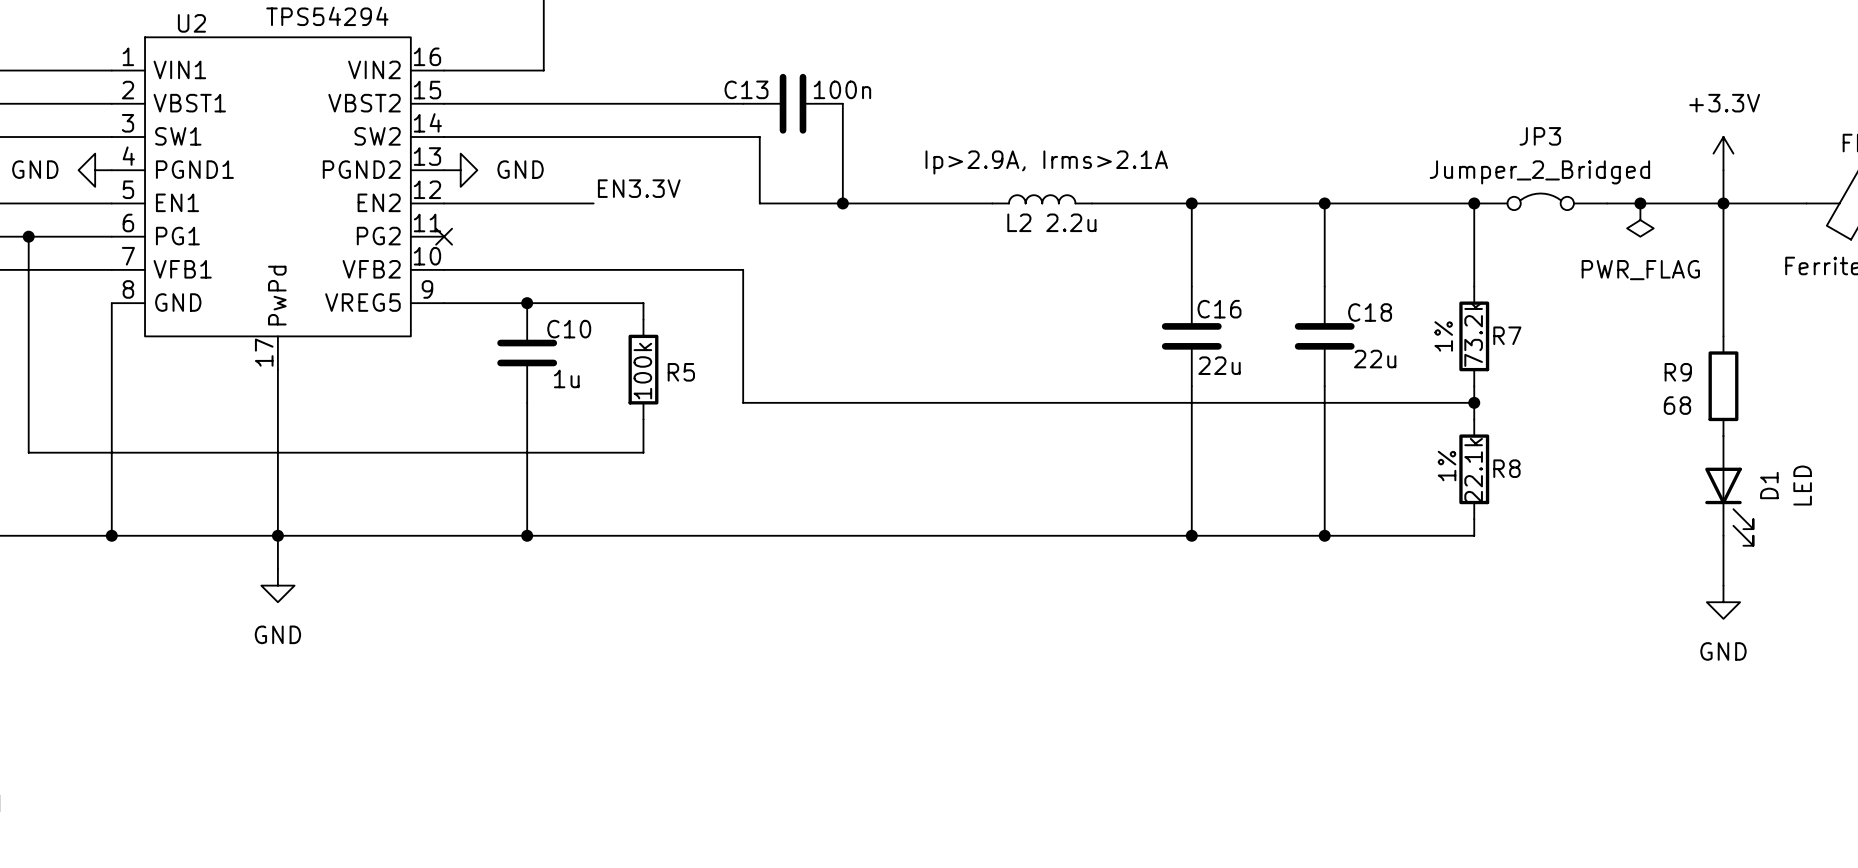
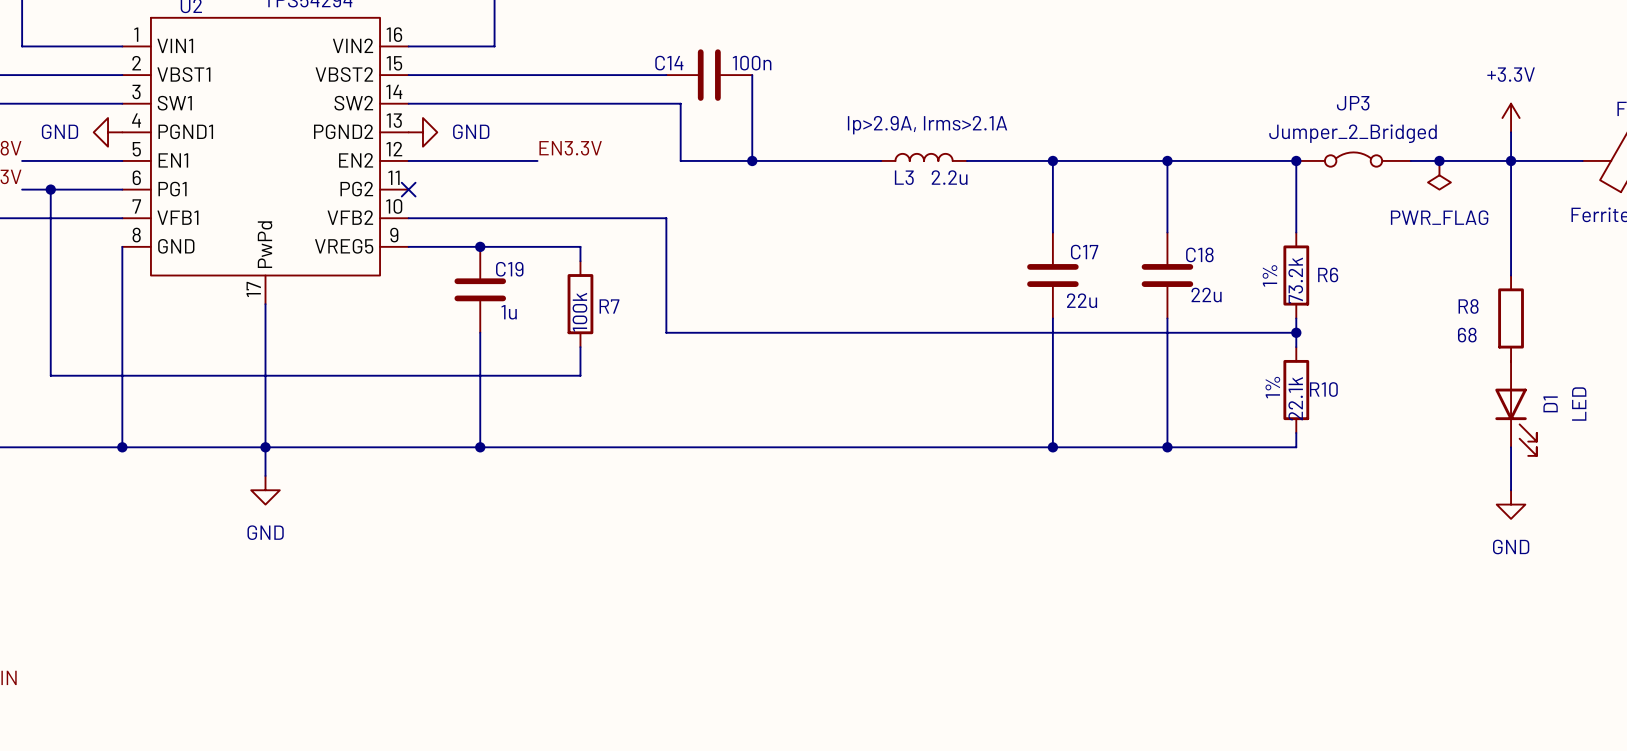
C13 name: C13 (746, 89) -> C14 (669, 63)
L2 name: L2 (1019, 222) -> L3 (904, 177)
C16 name: C16 (1219, 309) -> C17 (1084, 252)
C10 name: C10 (569, 329) -> C19 (509, 269)
R7 name: R7 (1507, 335) -> R6 (1328, 274)
R5 name: R5 (681, 372) -> R7 (609, 306)
R9 name: R9 (1678, 372) -> R8 (1468, 306)
R8 name: R8 (1506, 468) -> R10 (1323, 389)

